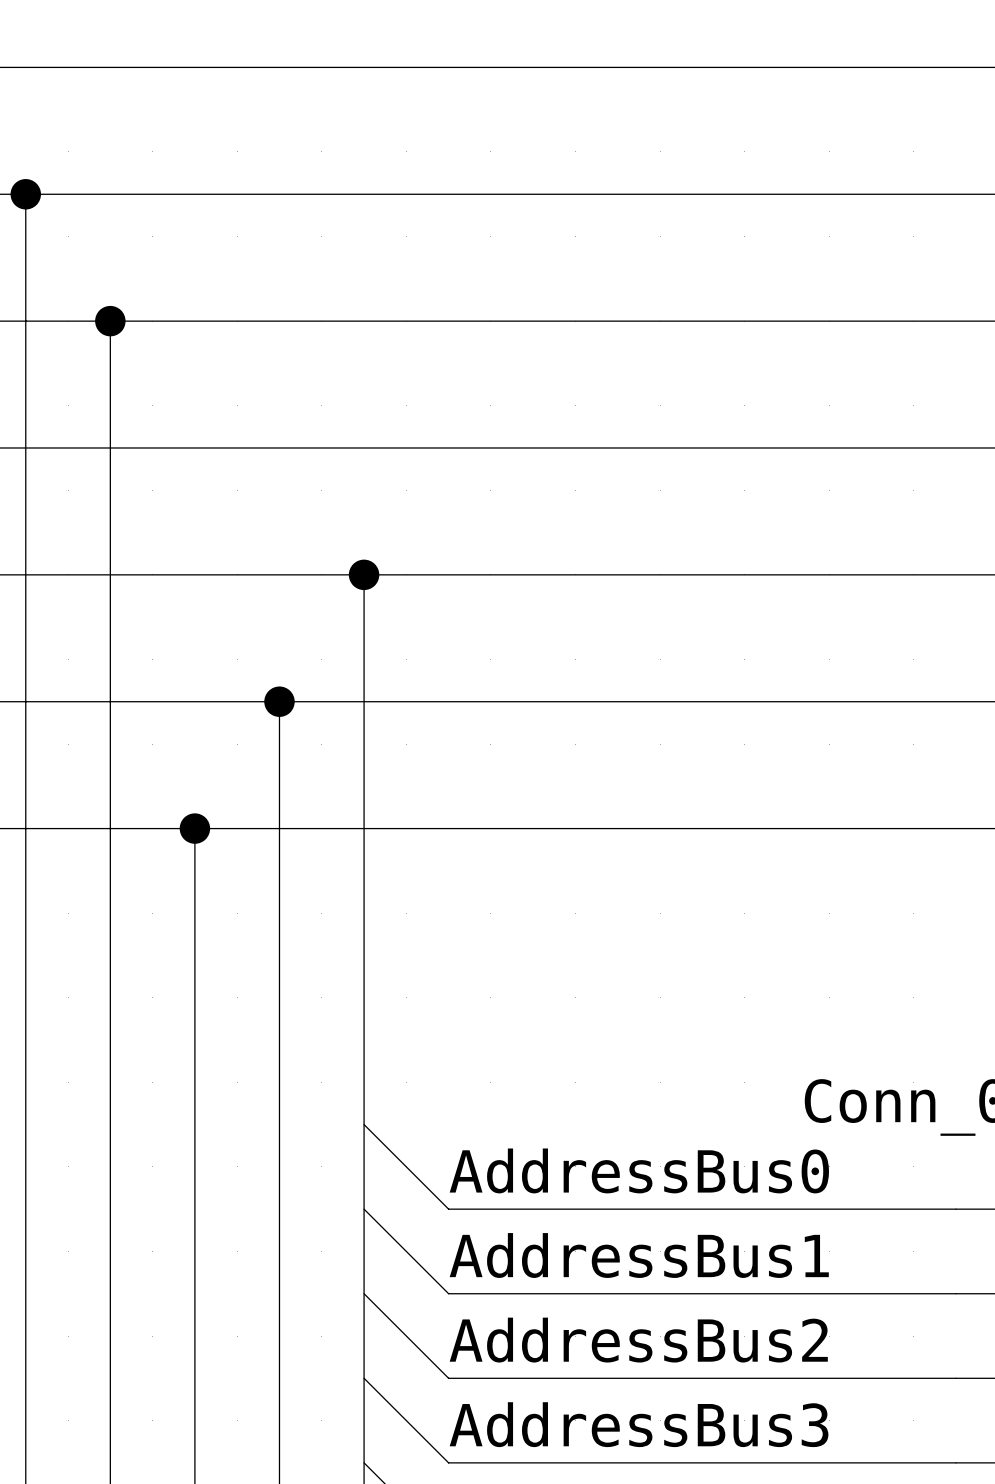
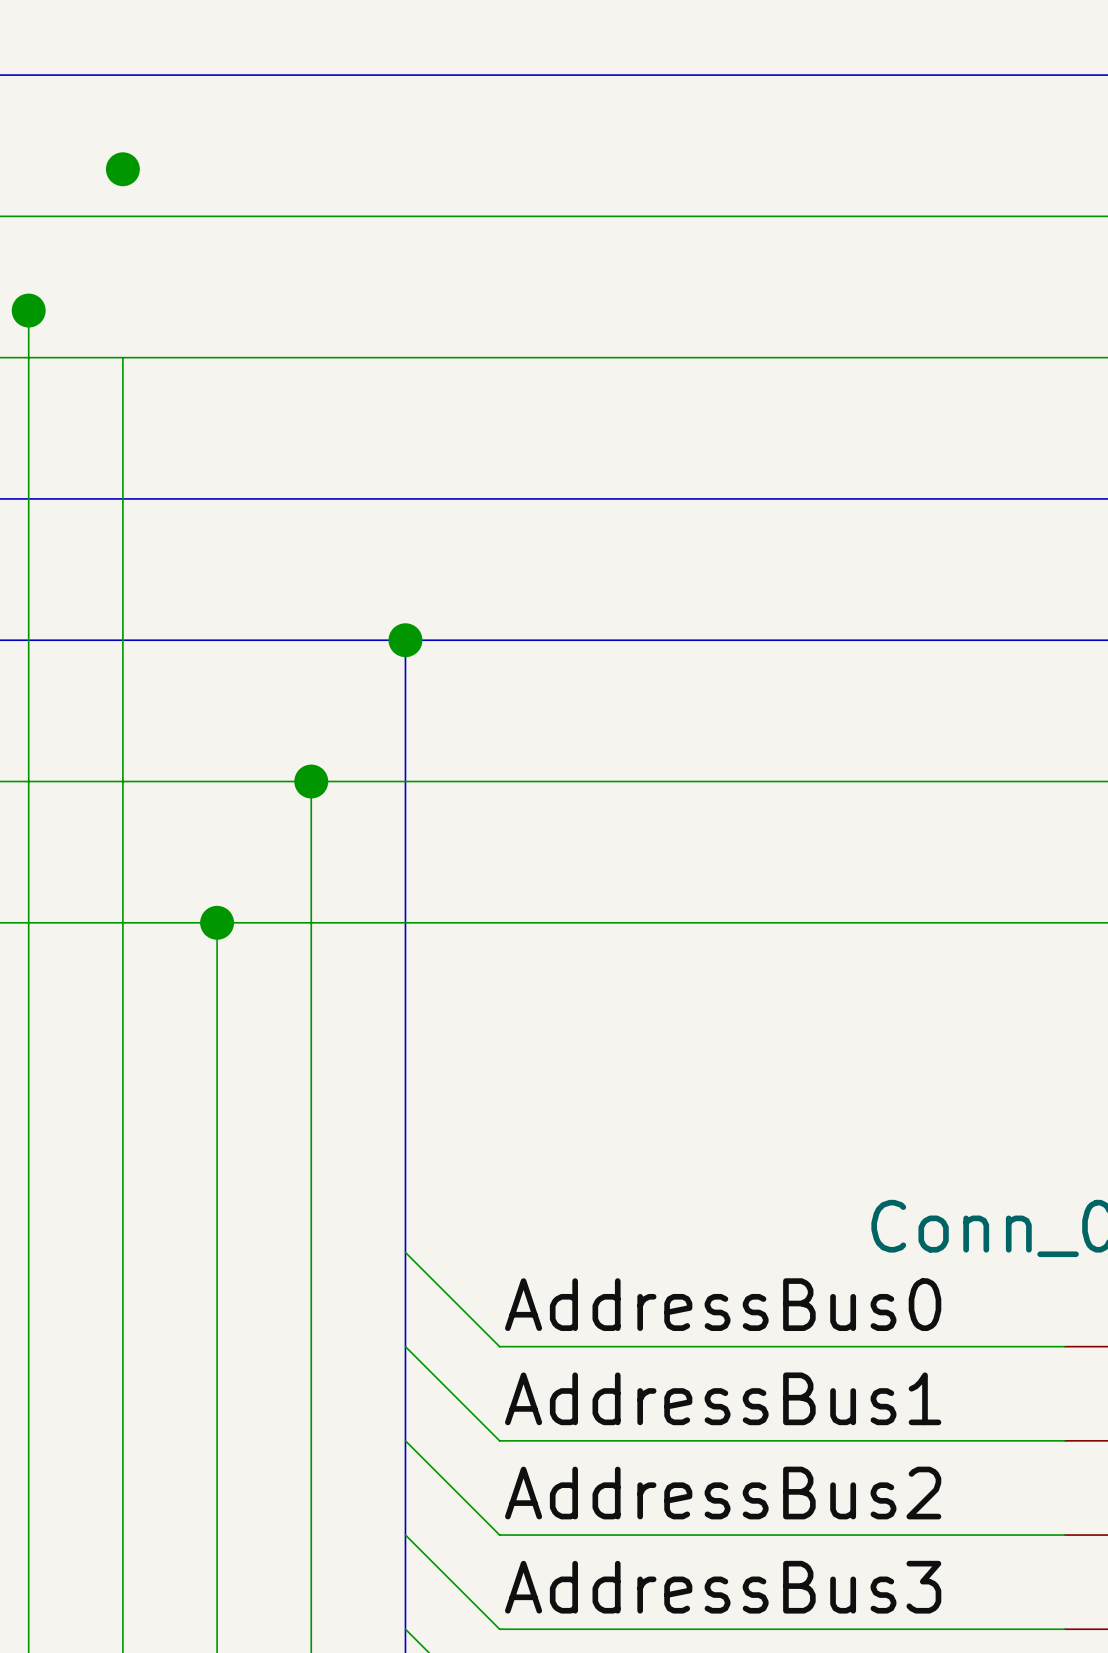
junction: none -> (122, 169)
wire: (25, 194) (25, 278) -> none
junction: (25, 194) -> none
junction: none -> (28, 310)
junction: (110, 321) -> none

